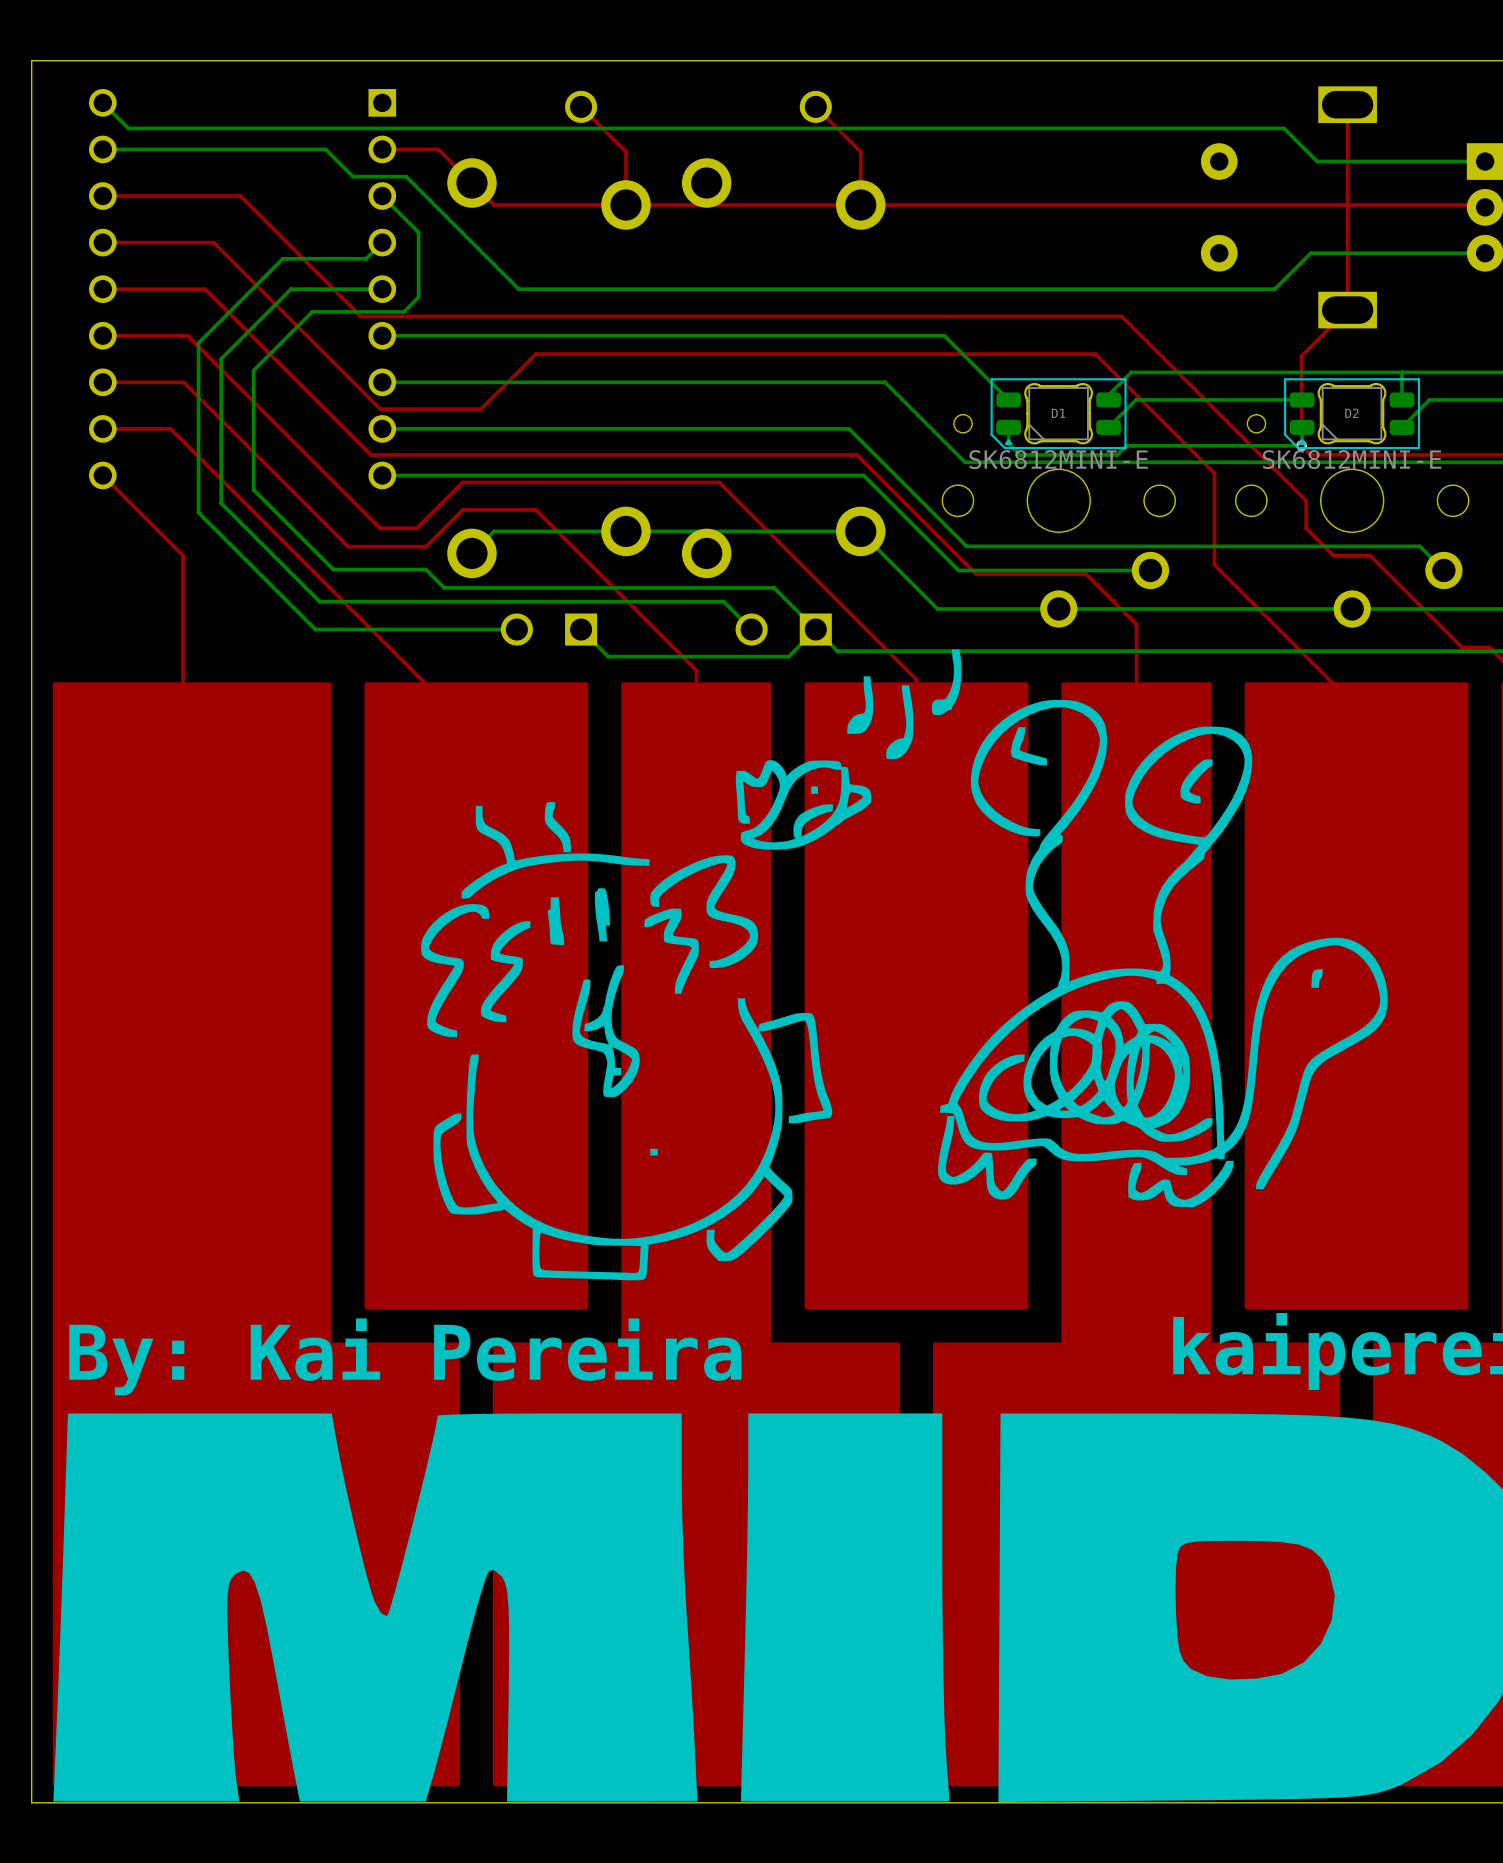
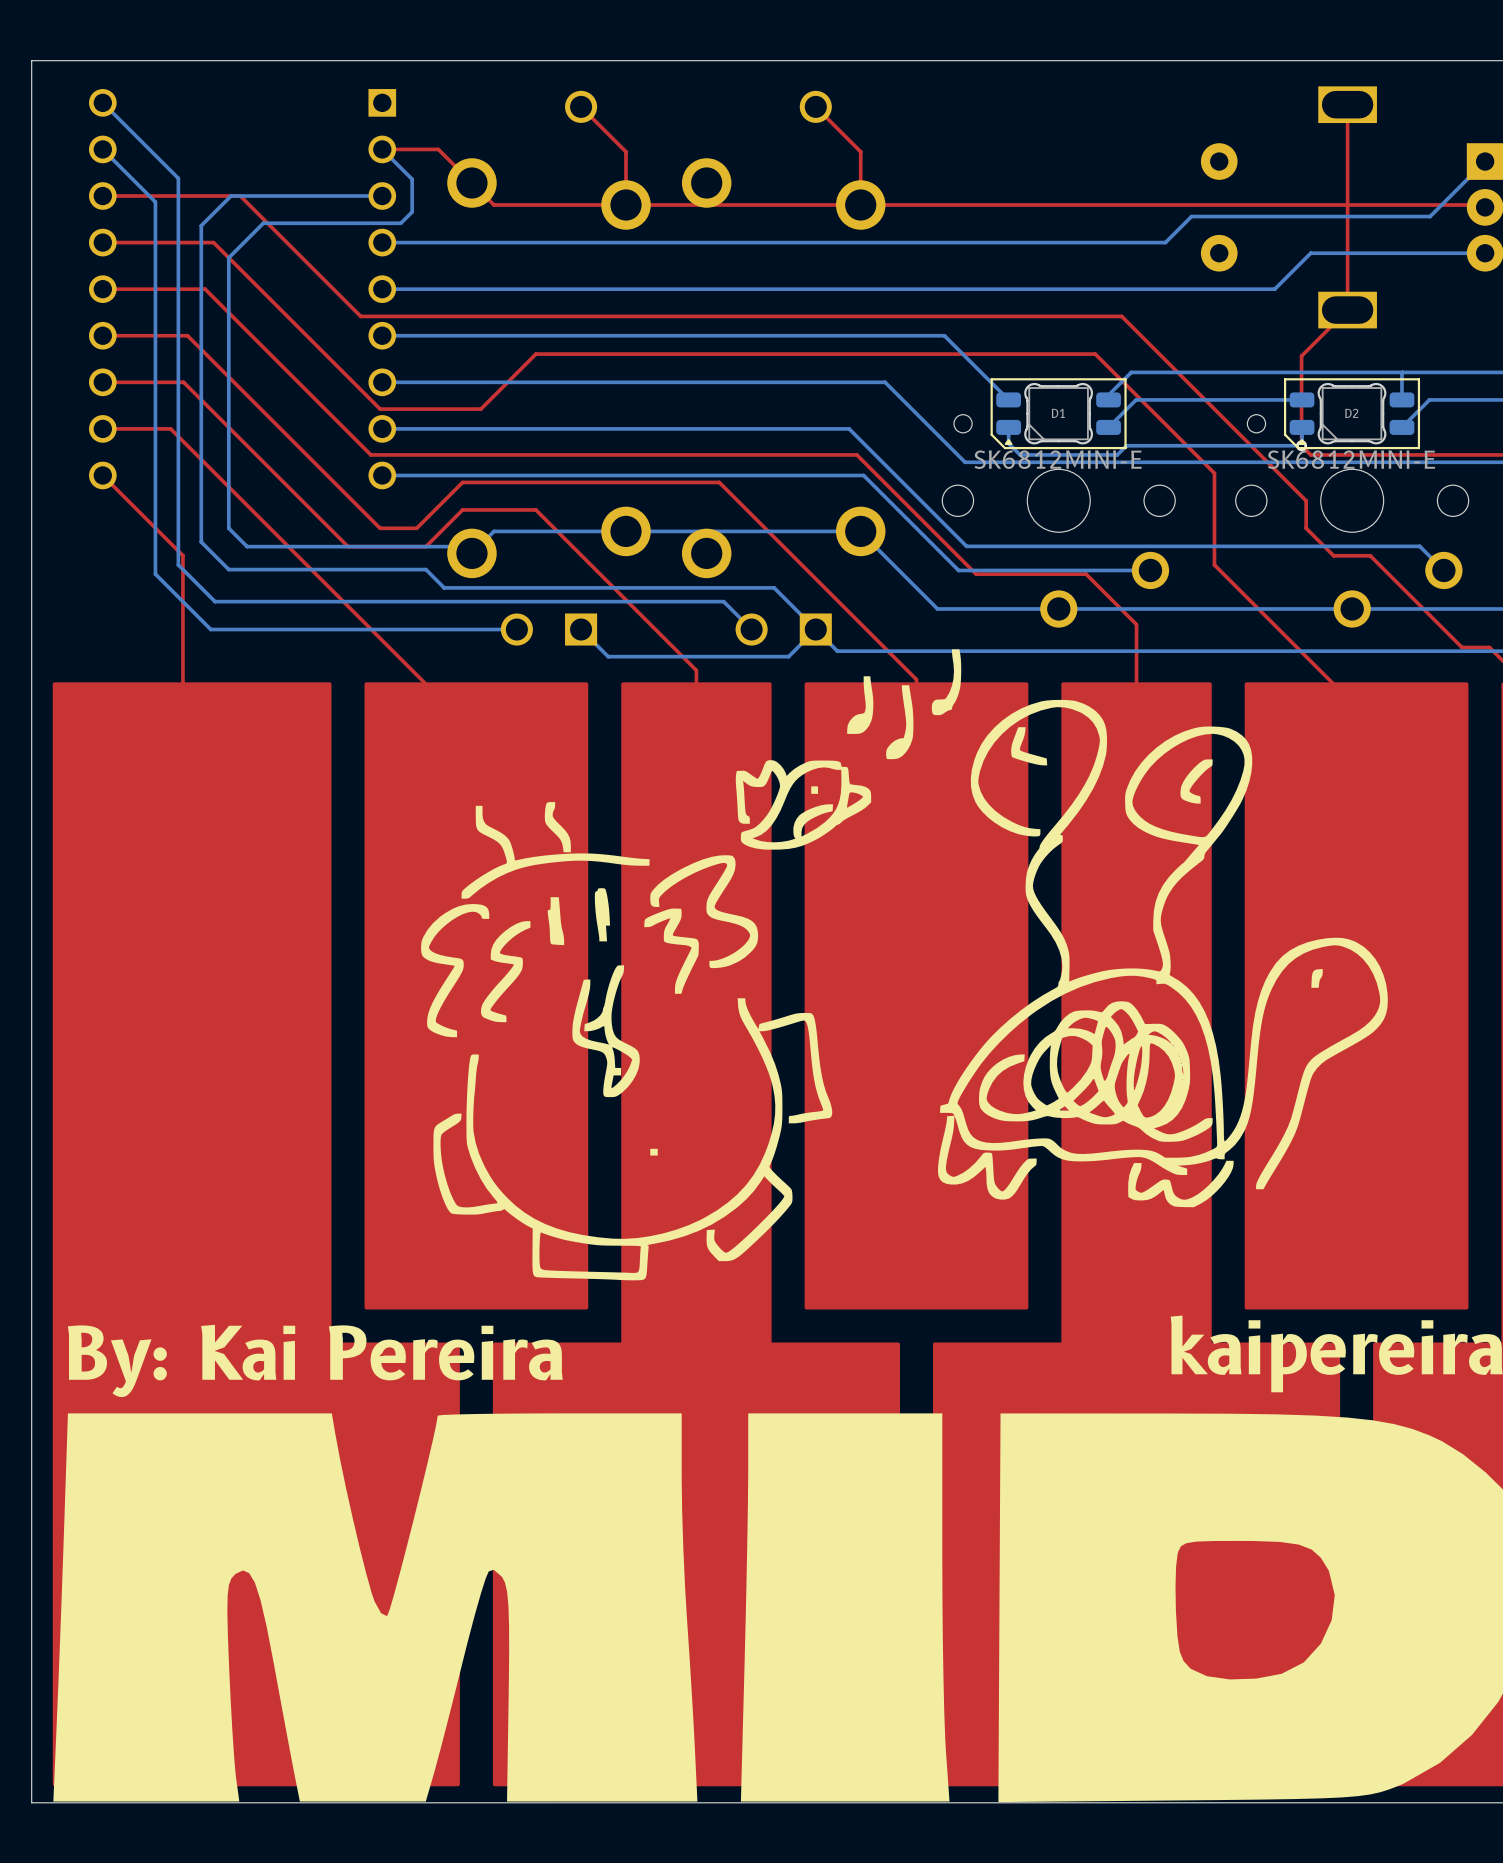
bottom track: (128, 128) (1284, 128) (1317, 161) (1485, 161) -> (382, 242) (1165, 242) (1191, 216) (1430, 216) (1485, 161)
bottom track: (102, 149) (325, 149) (353, 176) (406, 176) (518, 289) -> (382, 289) (518, 289)
bottom track: none -> (382, 149) (412, 179) (412, 211) (400, 223) (263, 223) (228, 257) (228, 528) (247, 546) (465, 546) (471, 553)
bottom track: (382, 196) (418, 232) (418, 297) (403, 311) (312, 311) (253, 370) (253, 489) (333, 569) -> (382, 196) (231, 196) (201, 225) (201, 542) (228, 569) (333, 569)
bottom track: (382, 242) (366, 258) (282, 258) (198, 343) (198, 512) (315, 629) -> (102, 149) (155, 202) (155, 574) (210, 629) (315, 629)
bottom track: (382, 289) (290, 289) (221, 358) (221, 503) (319, 601) -> (128, 128) (178, 178) (178, 564) (215, 601) (319, 601)

